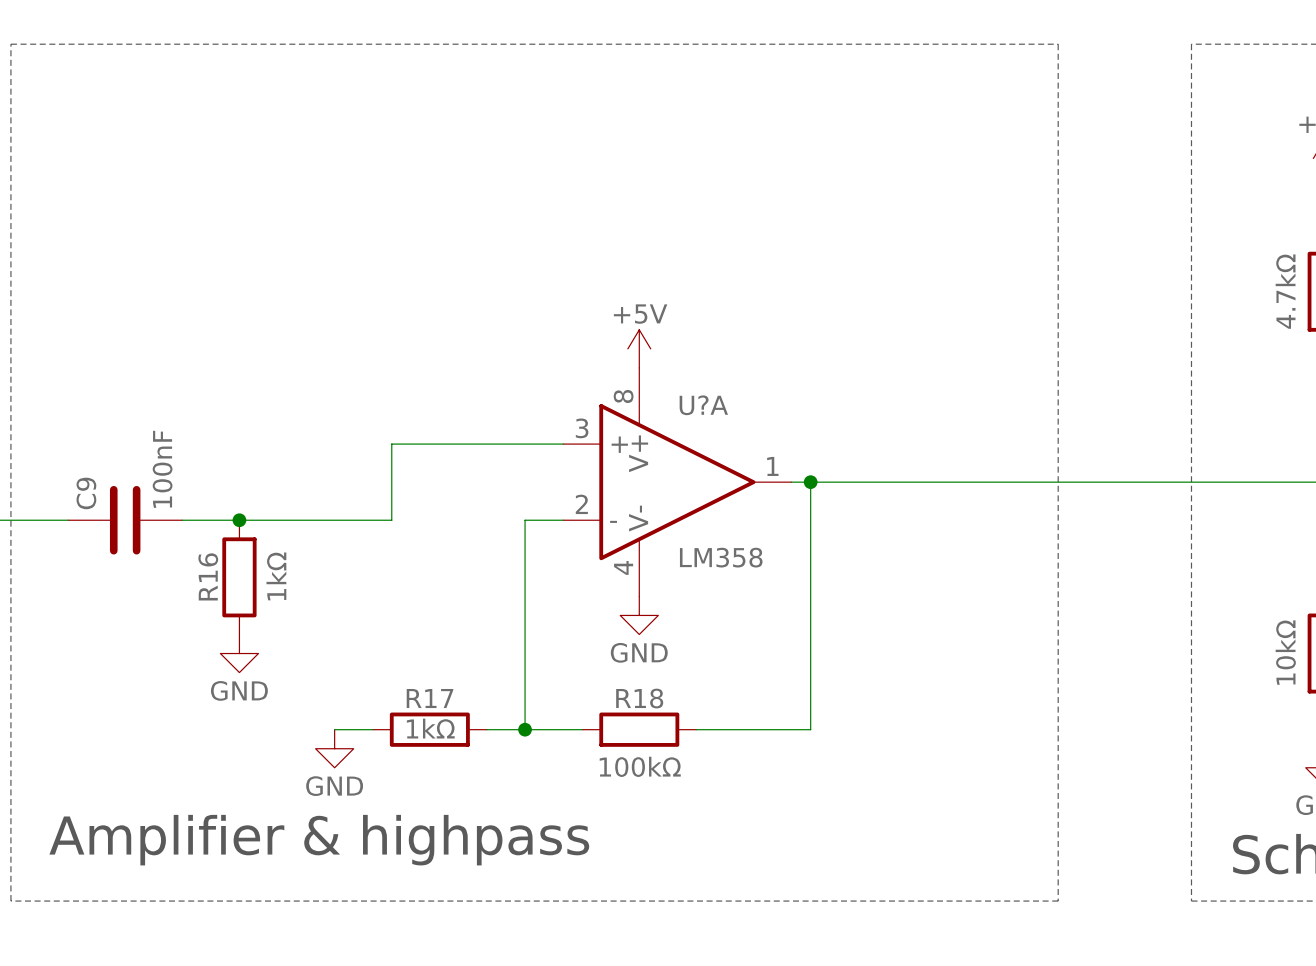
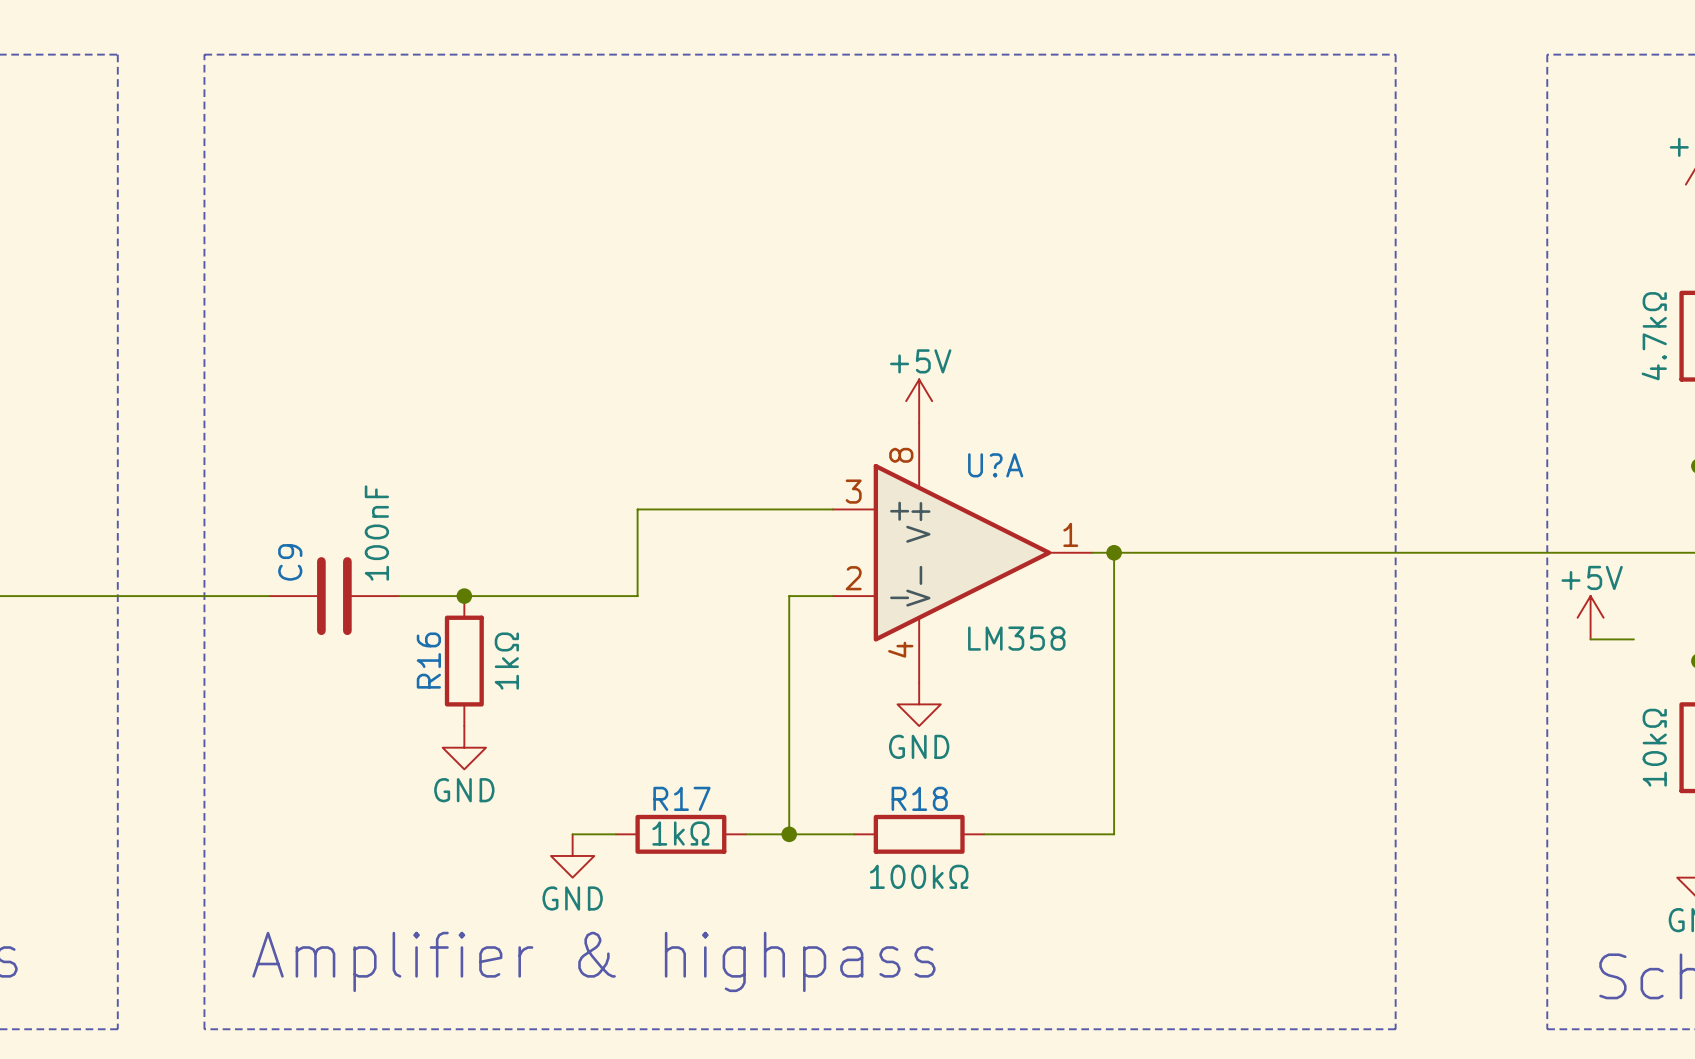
power symbol: none -> +5V (1590, 617)
wire: none -> (1590, 639) (1633, 639)

